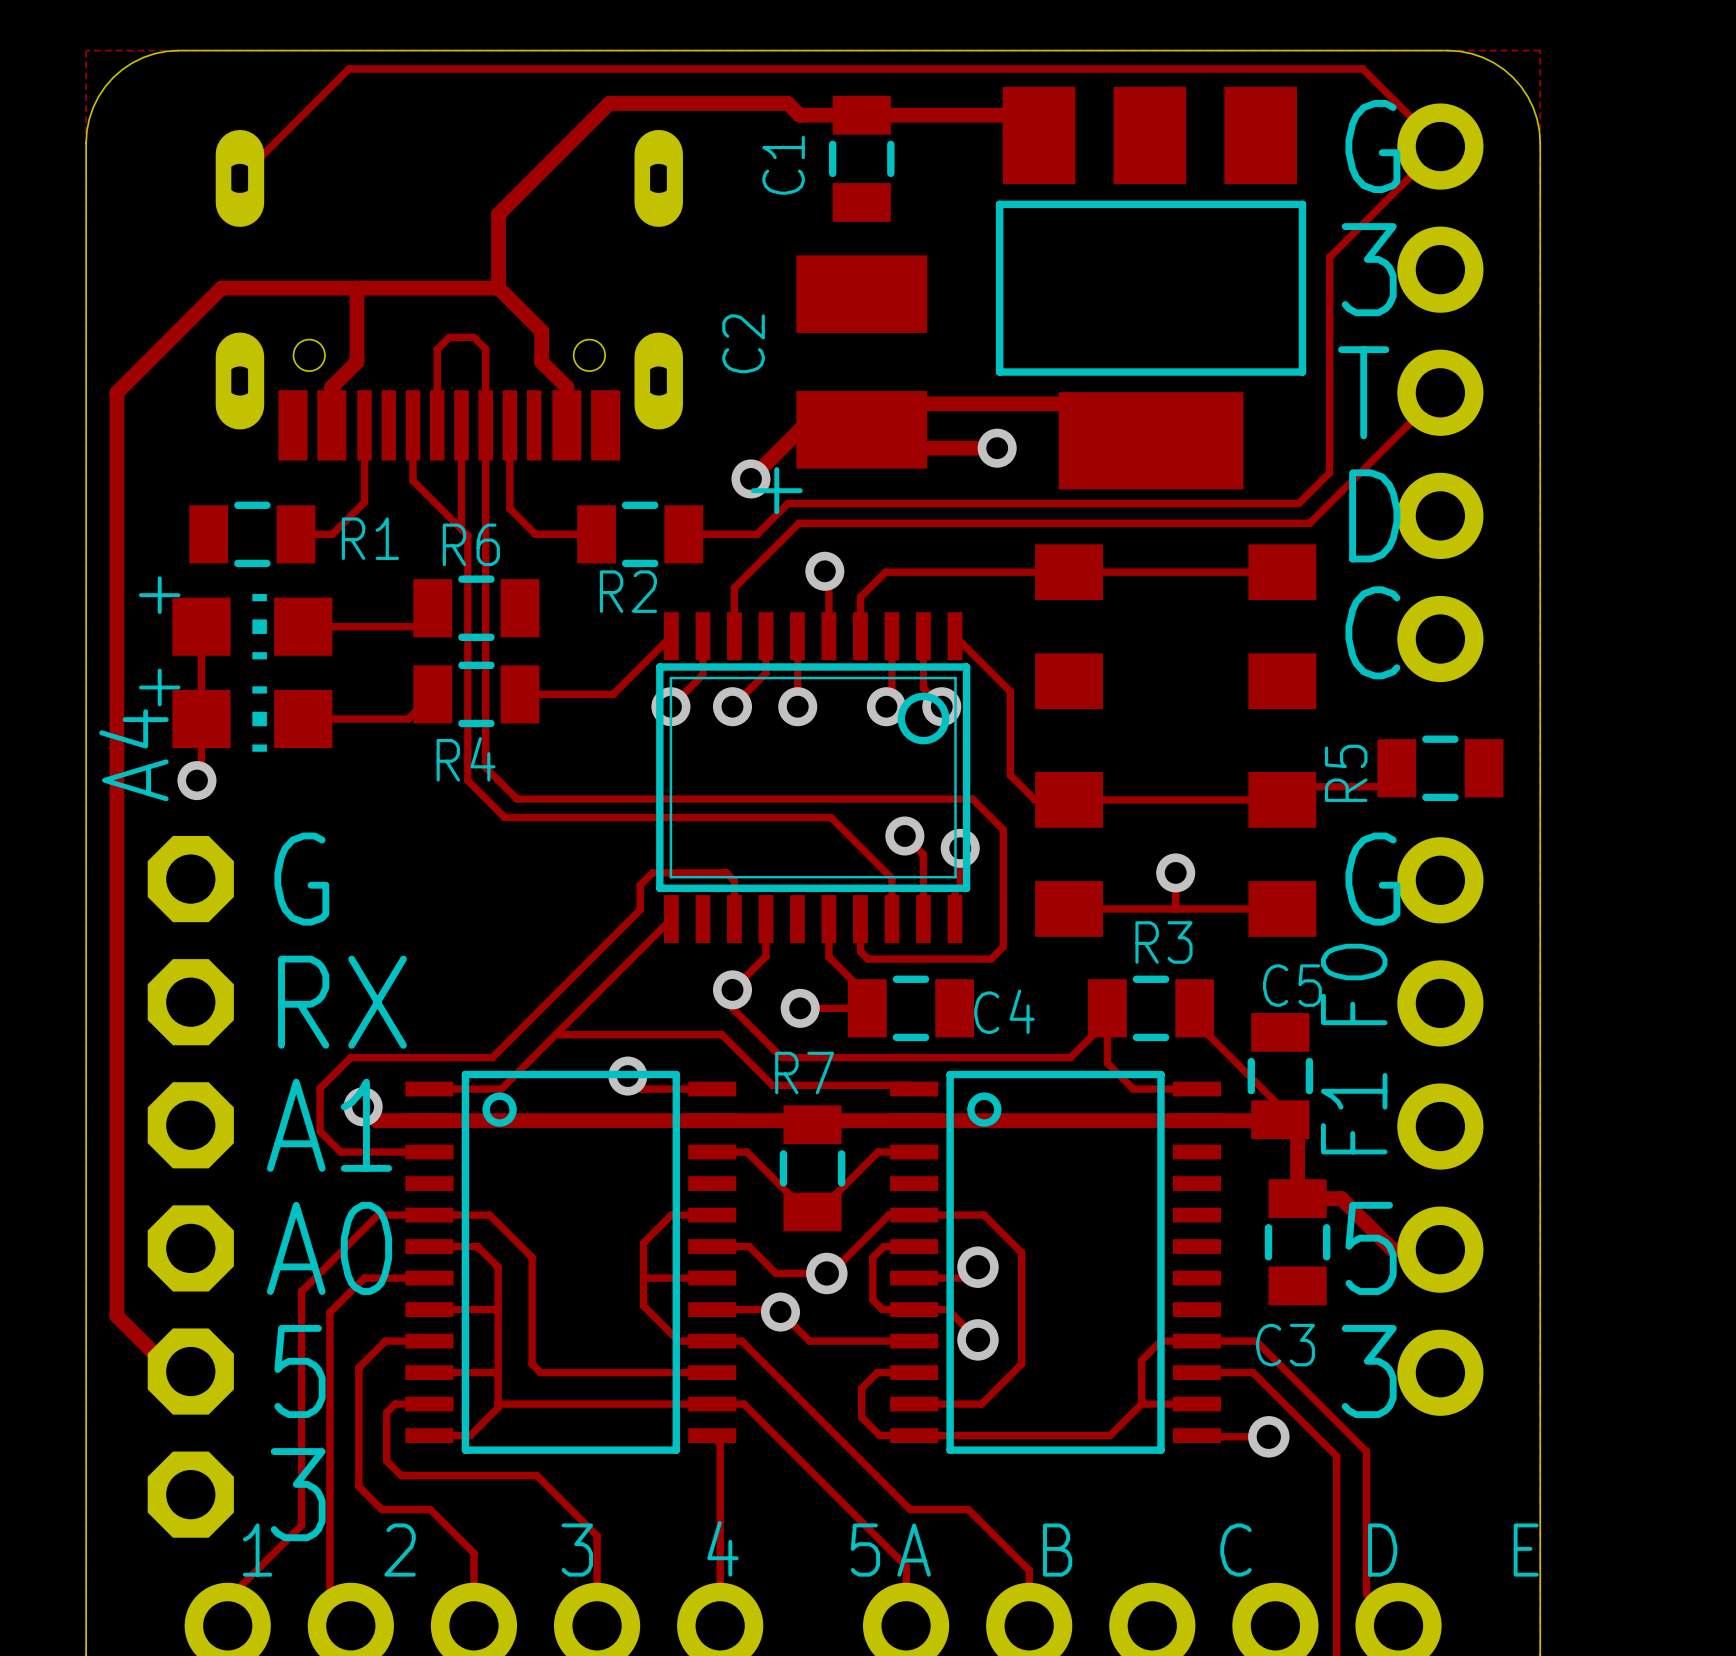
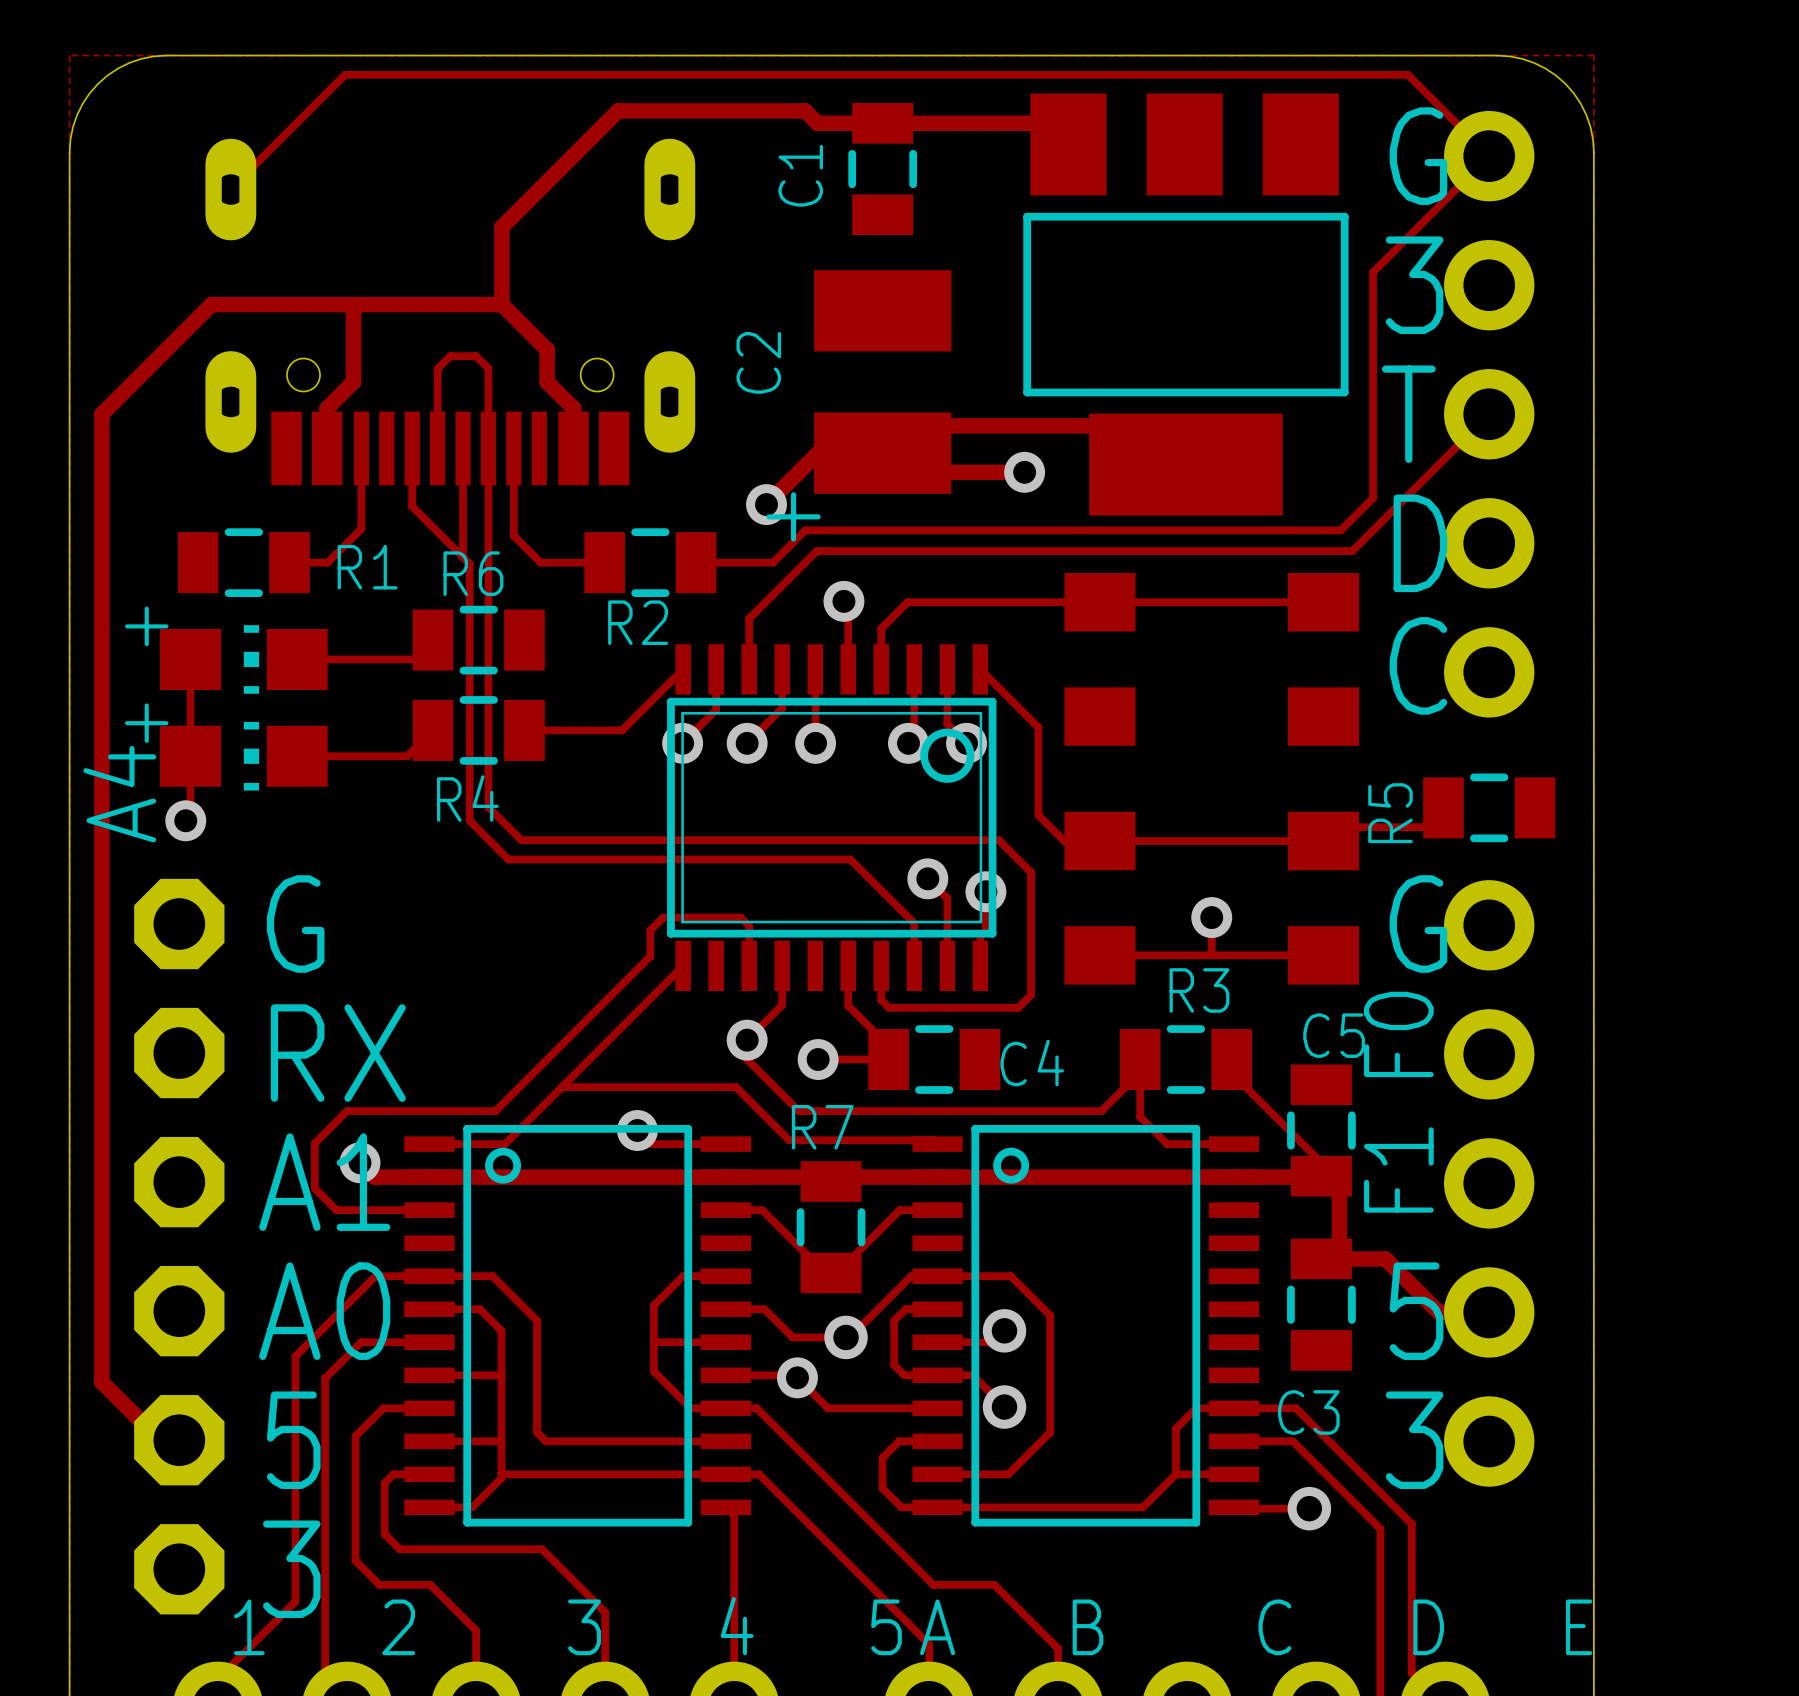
C3 position: (1297, 1242) -> (1321, 1304)

